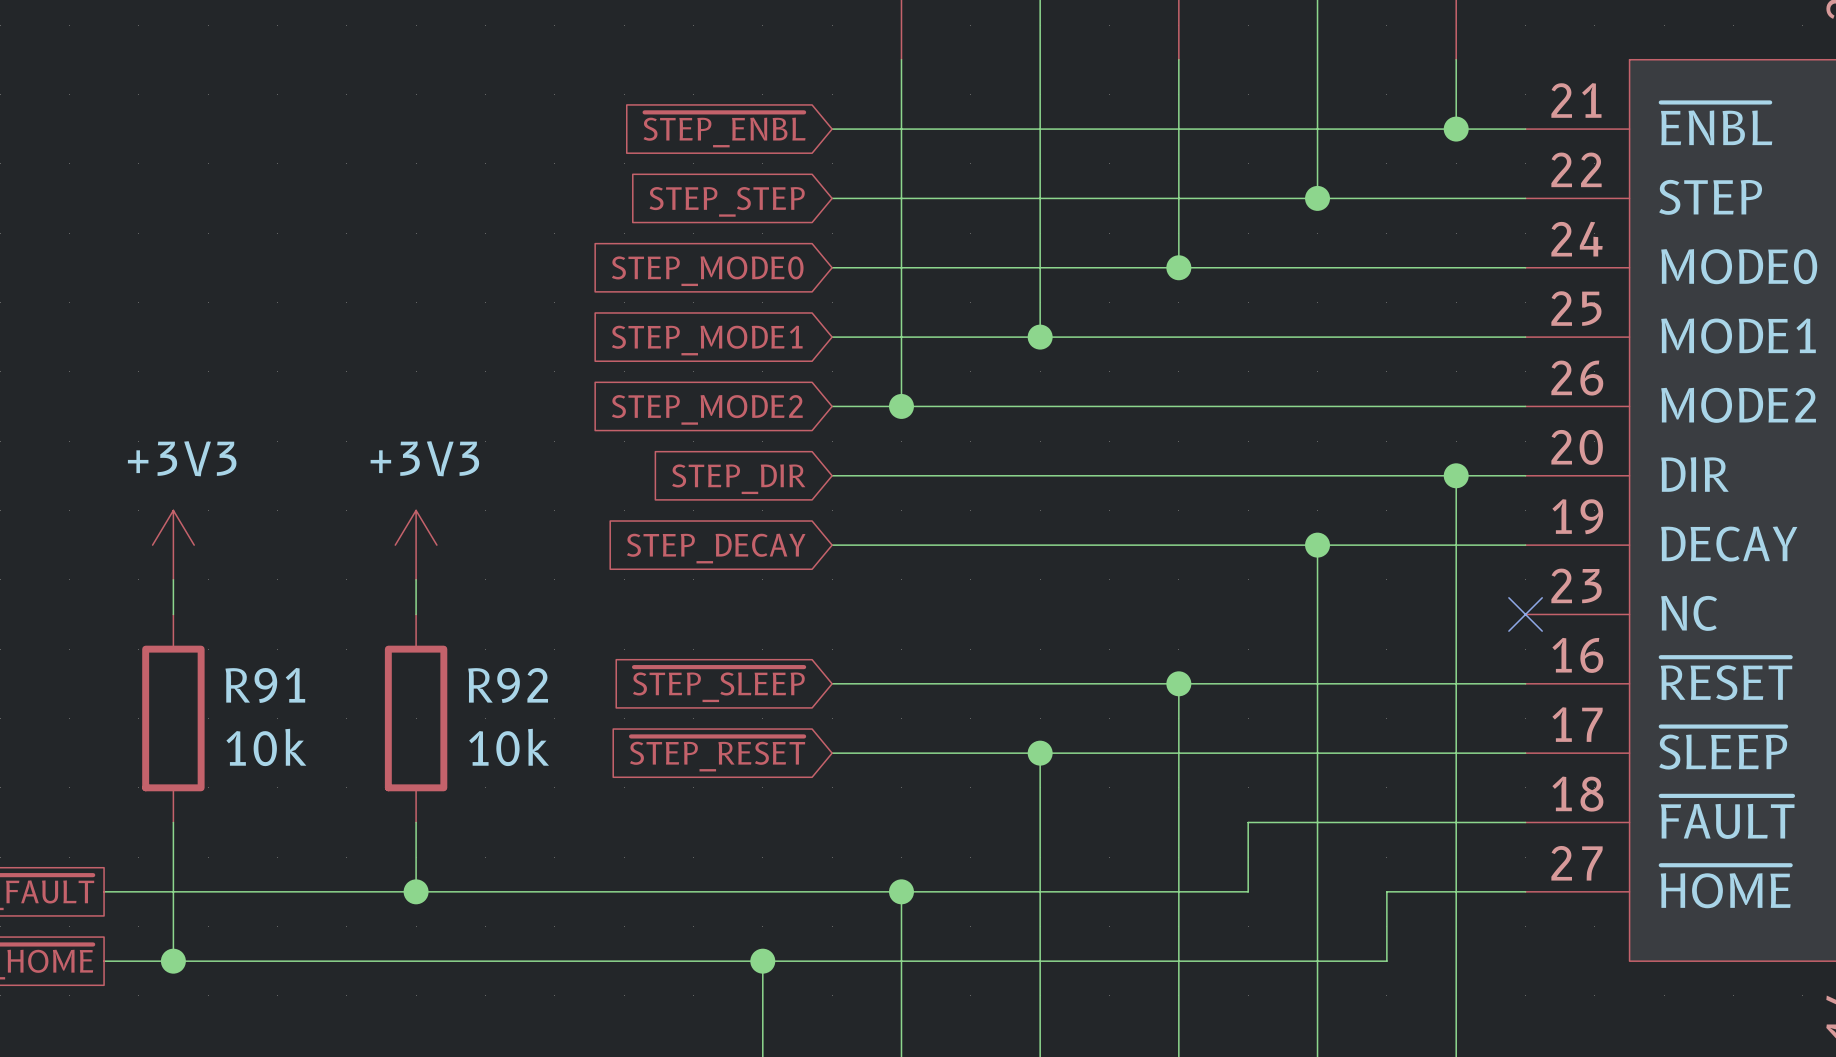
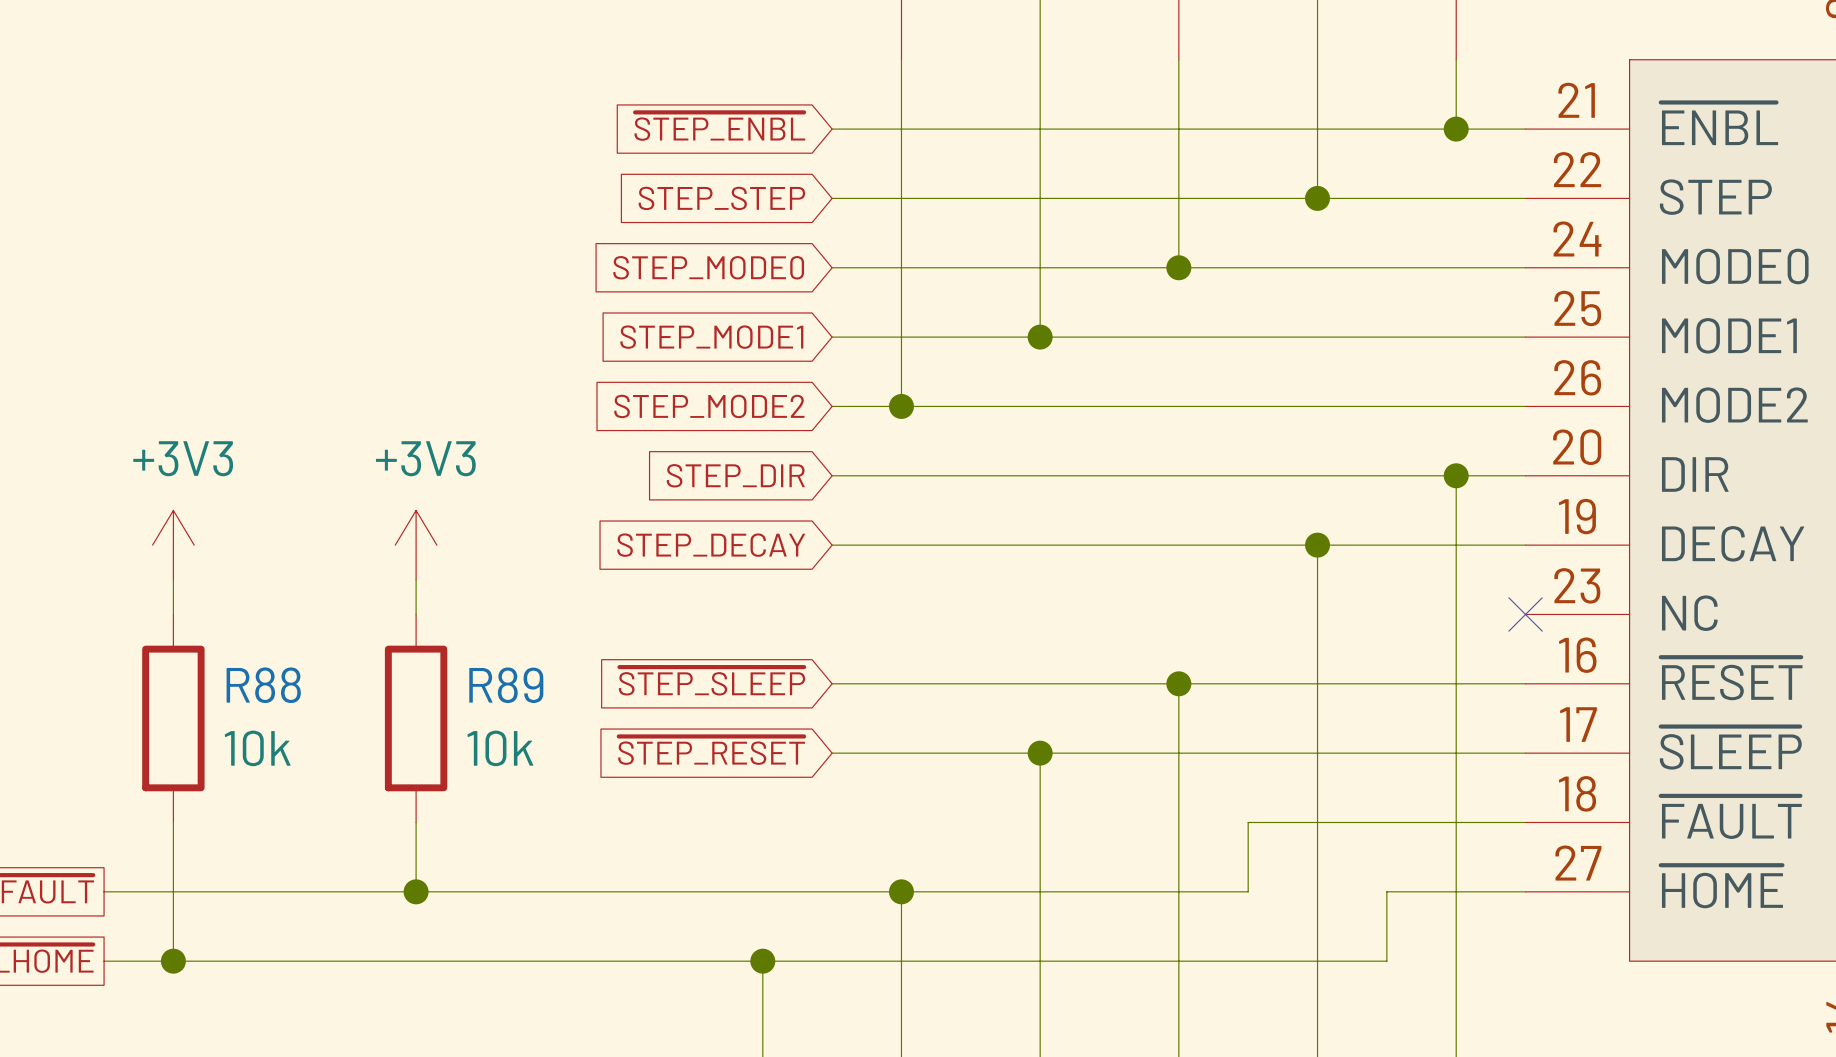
R91 name: R91 (265, 685) -> R88 (263, 685)
R92 name: R92 (508, 685) -> R89 (506, 685)

